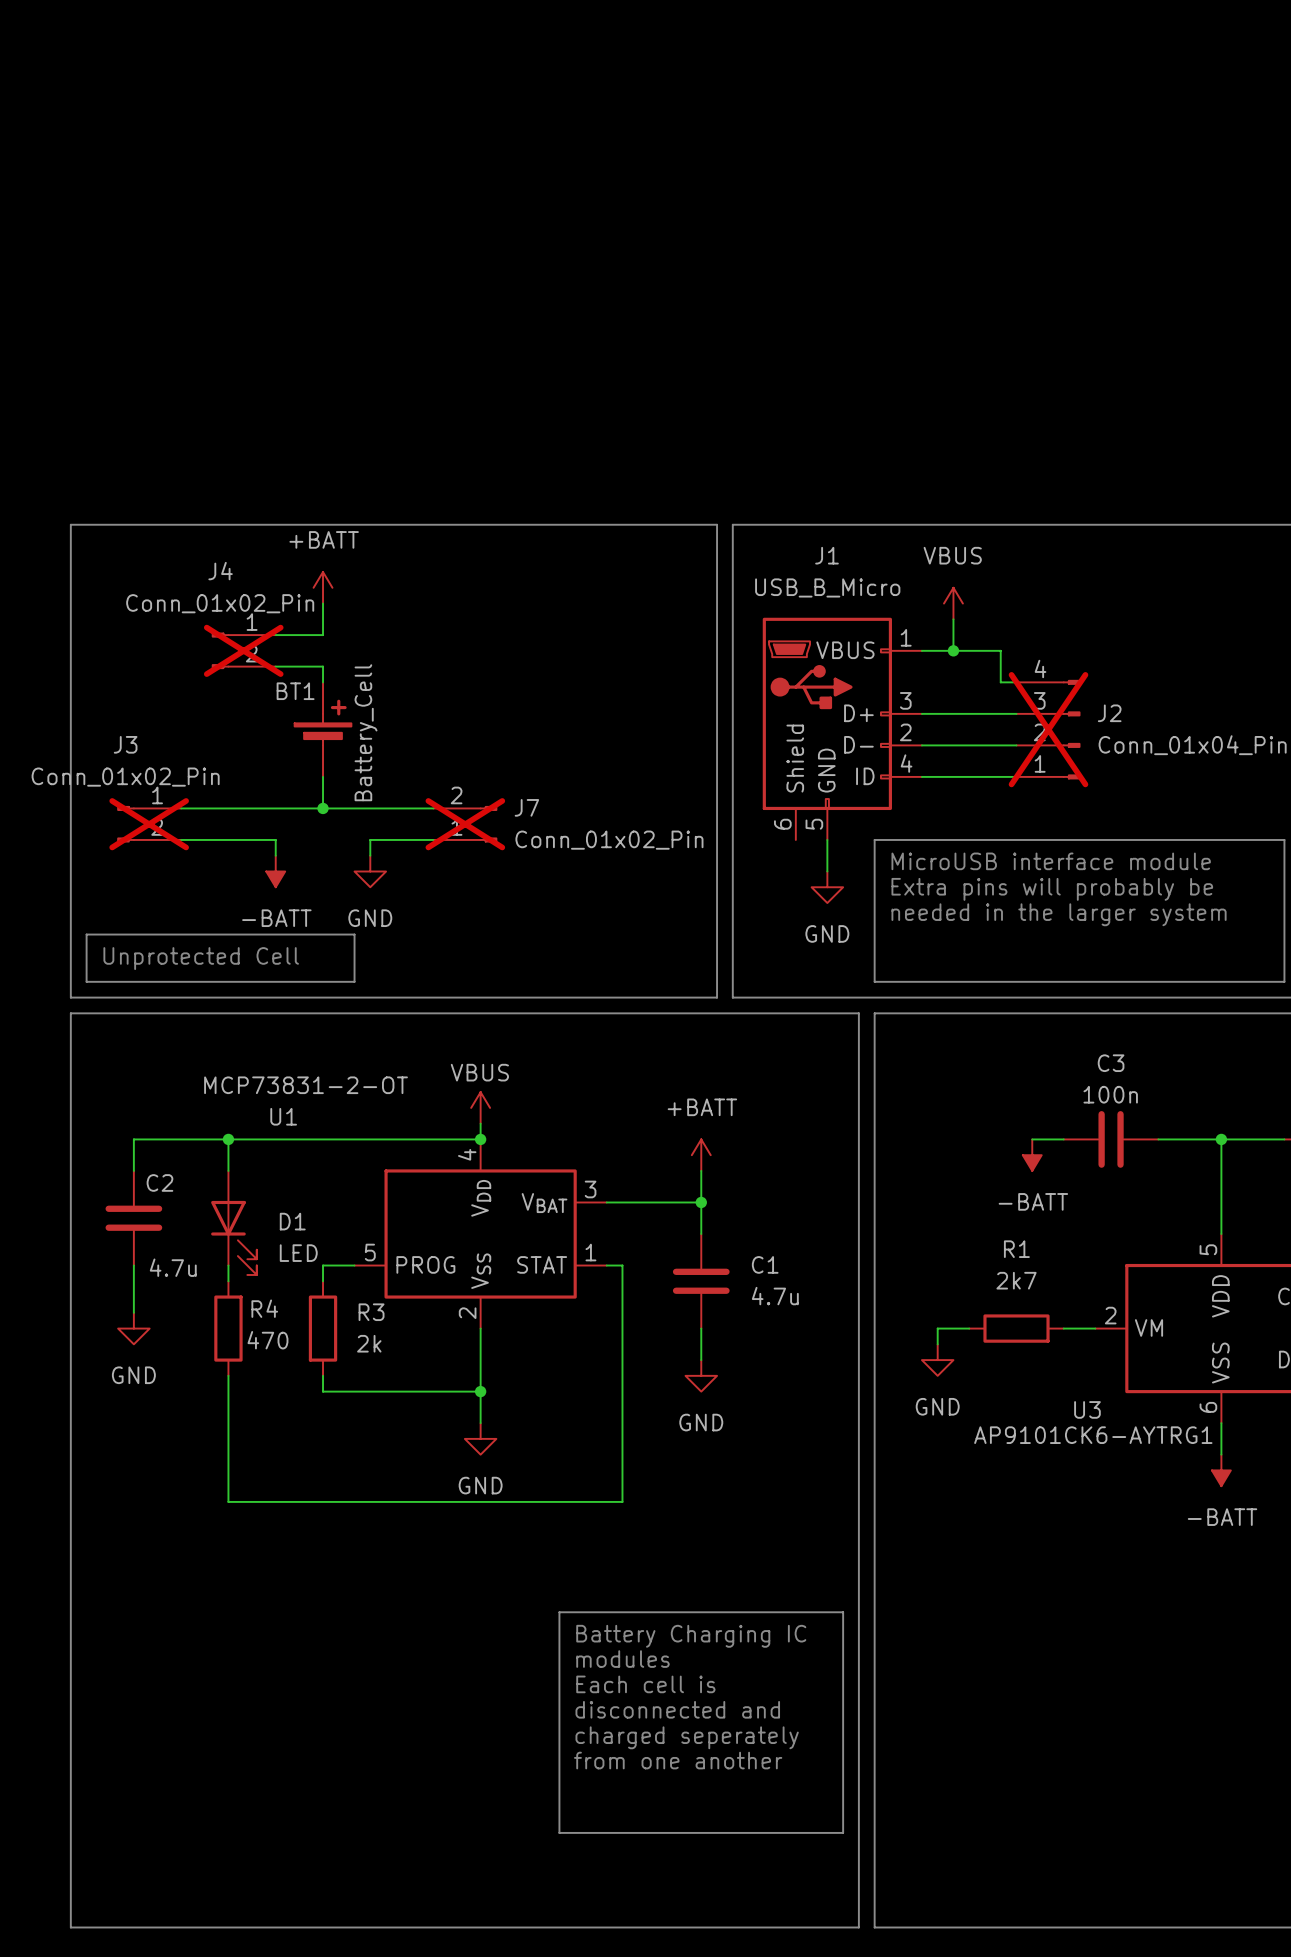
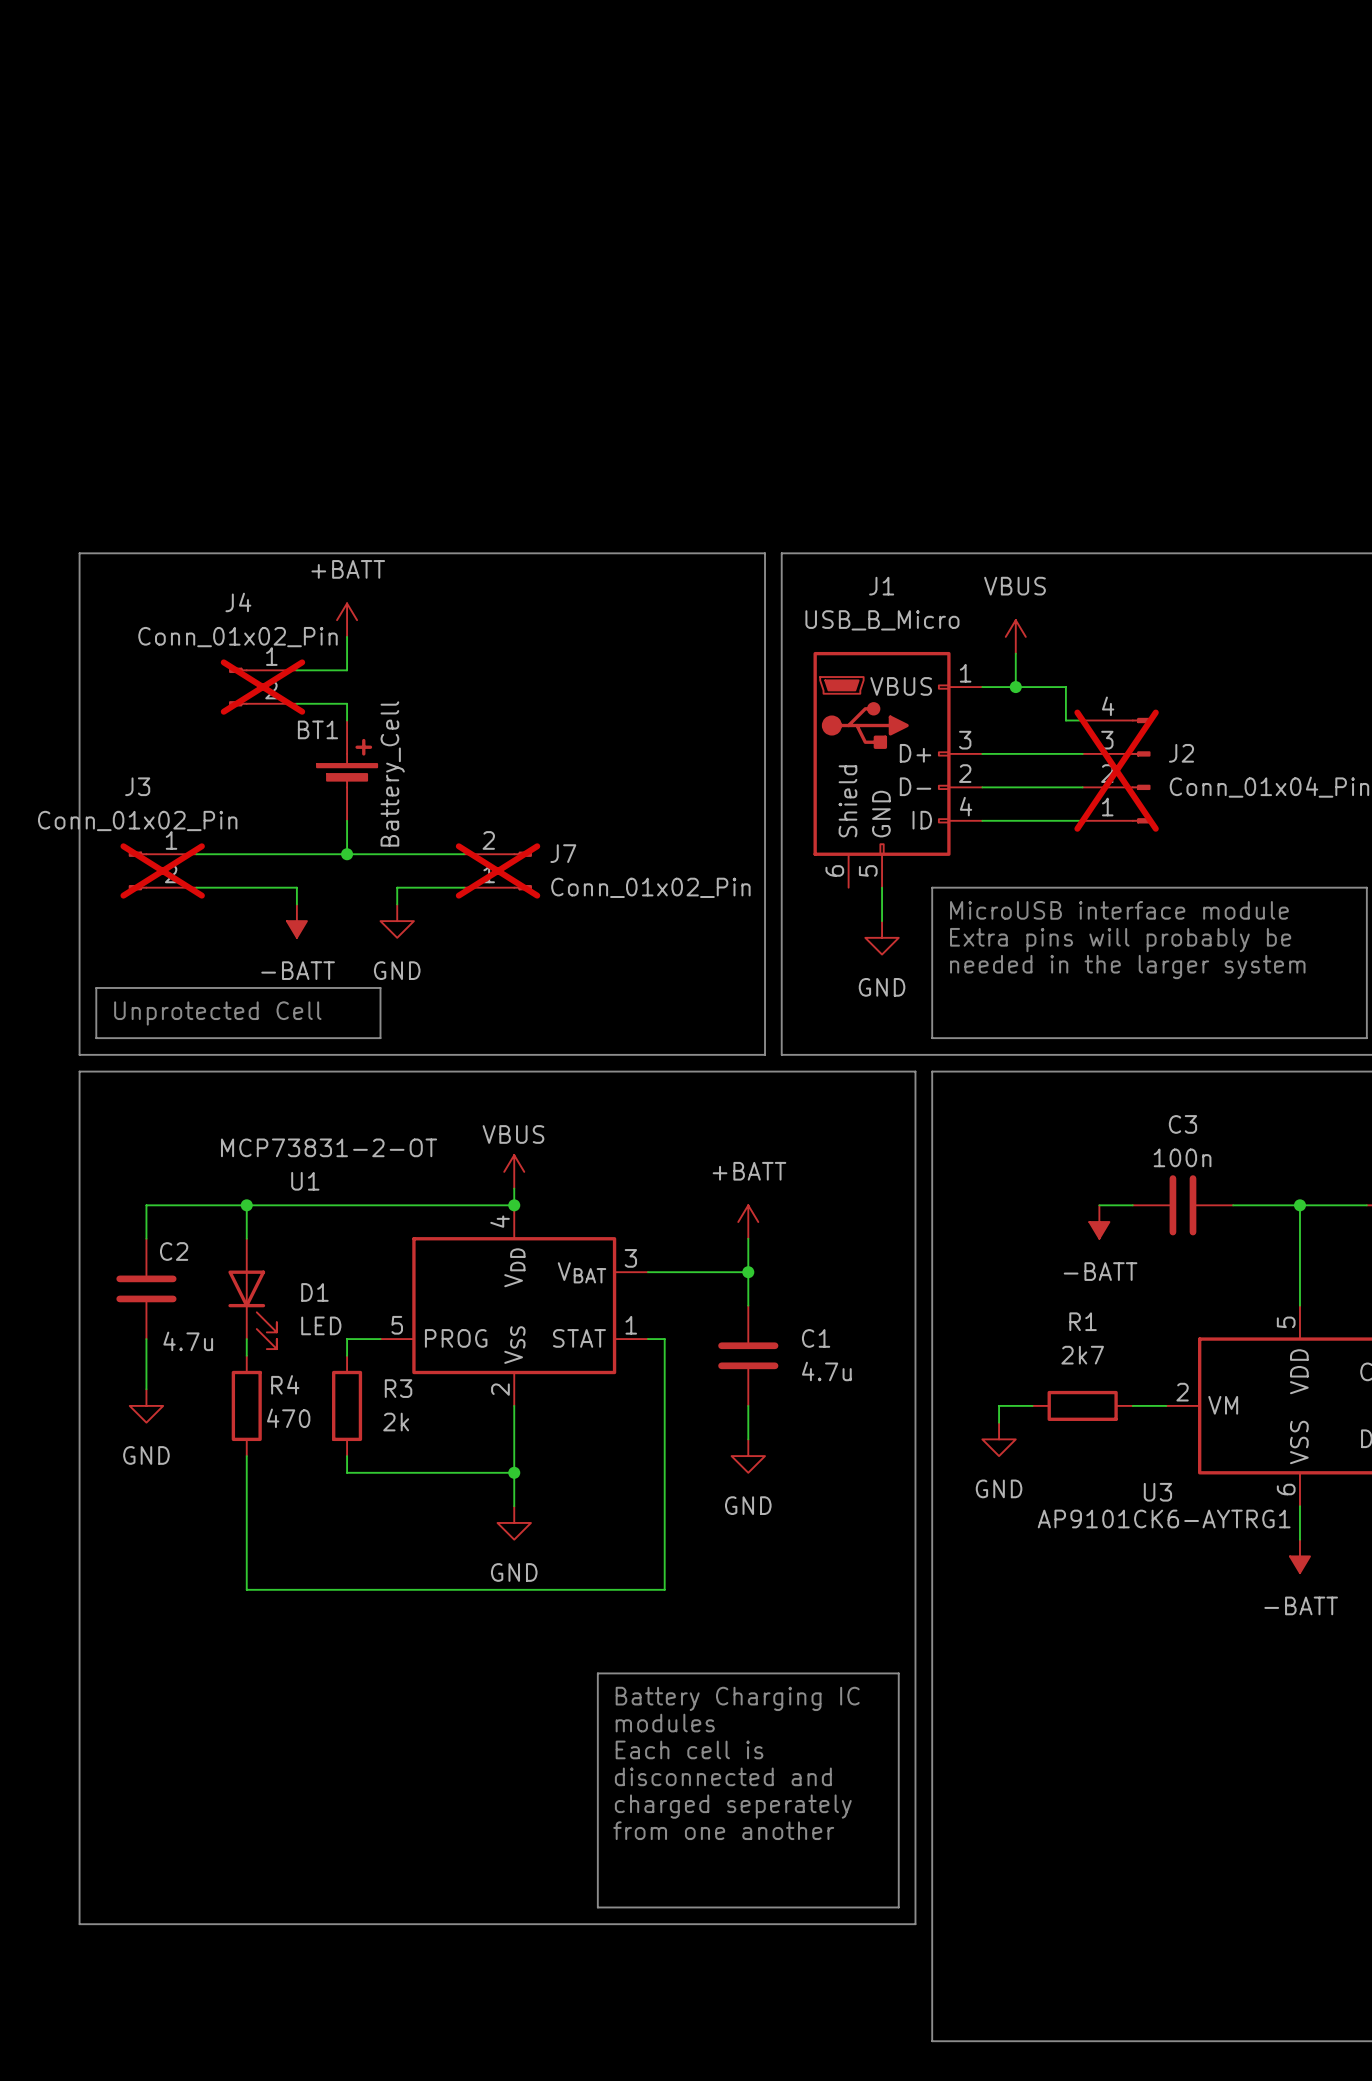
text: none -> Battery Charging IC (737, 1698)
line: (559, 1612) (843, 1612) -> (597, 1706) (597, 1673) (898, 1673) (898, 1706)
text: Battery Charging IC (691, 1636) -> modules (665, 1723)
text: modules (622, 1659) -> Each cell is (689, 1749)
text: Each cell is (645, 1684) -> disconnected and (723, 1776)
text: disconnected and (677, 1709) -> charged seperately (733, 1806)
text: charged seperately (687, 1737) -> from one another (723, 1830)
text: from one another (678, 1760) -> none
line: (559, 1801) (559, 1832) (843, 1832) (843, 1801) -> (597, 1907) (898, 1907)
line: (70, 1817) (70, 1927) (858, 1927) (858, 1817) -> (79, 1924) (915, 1924)

